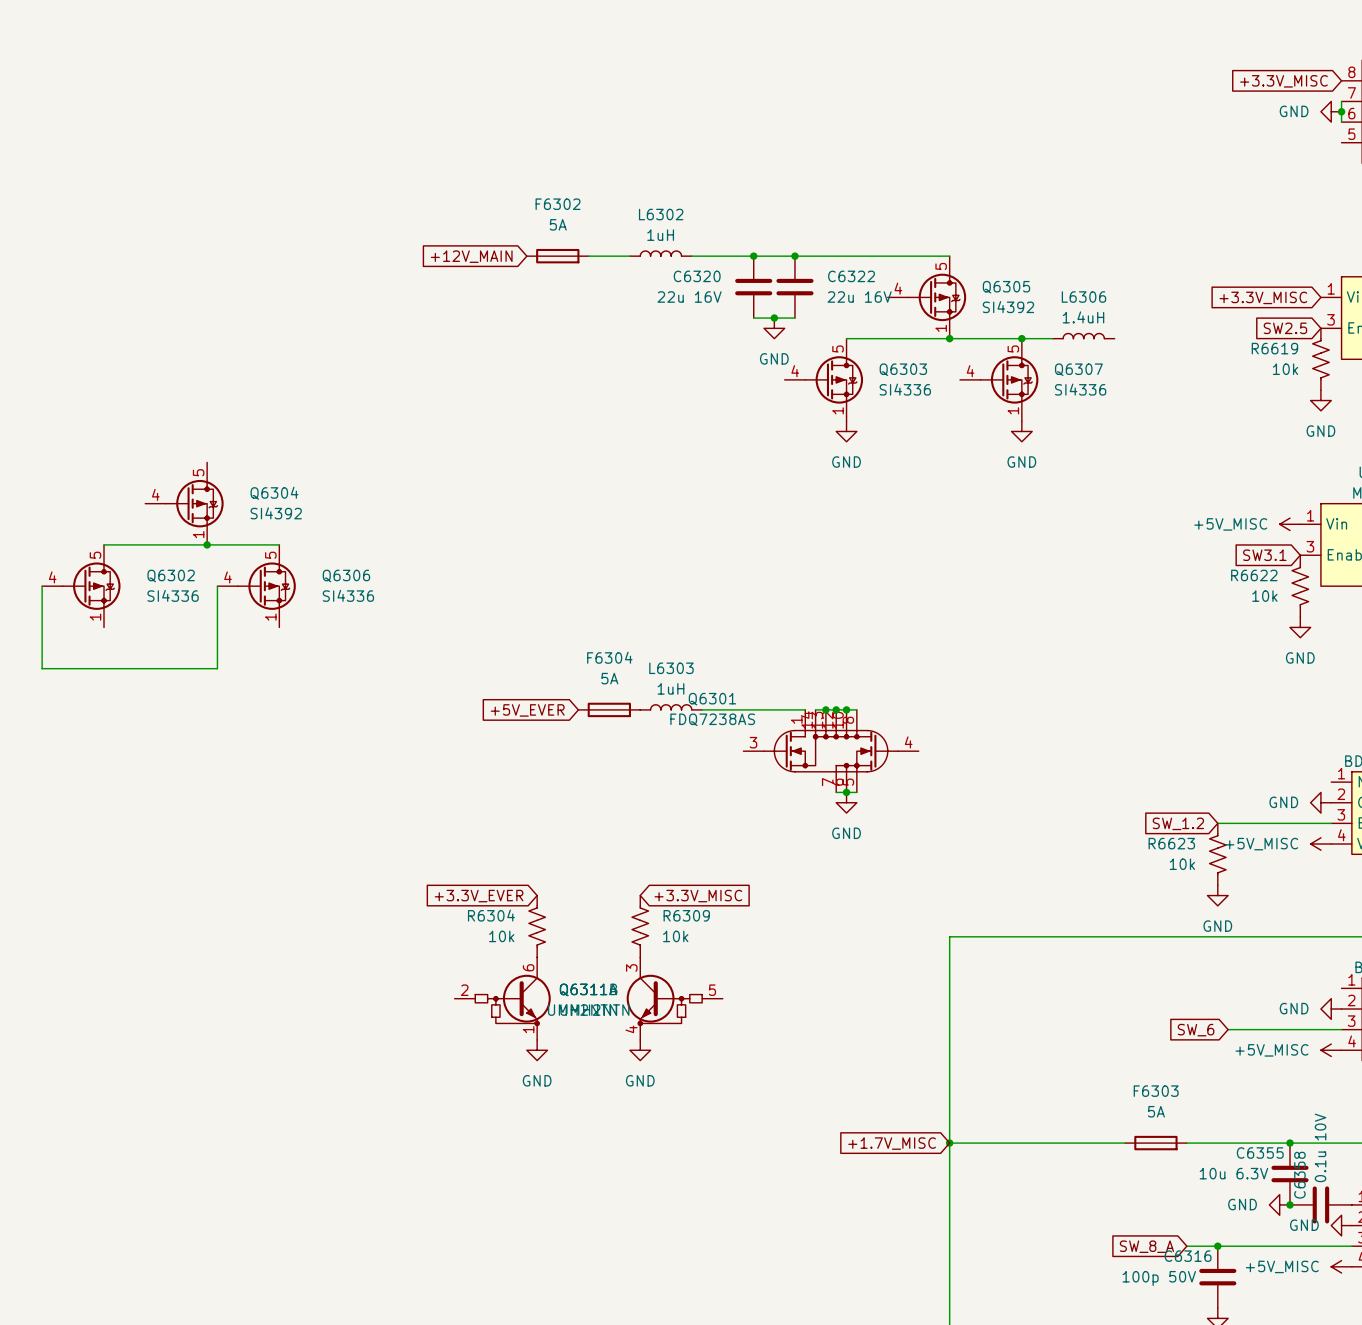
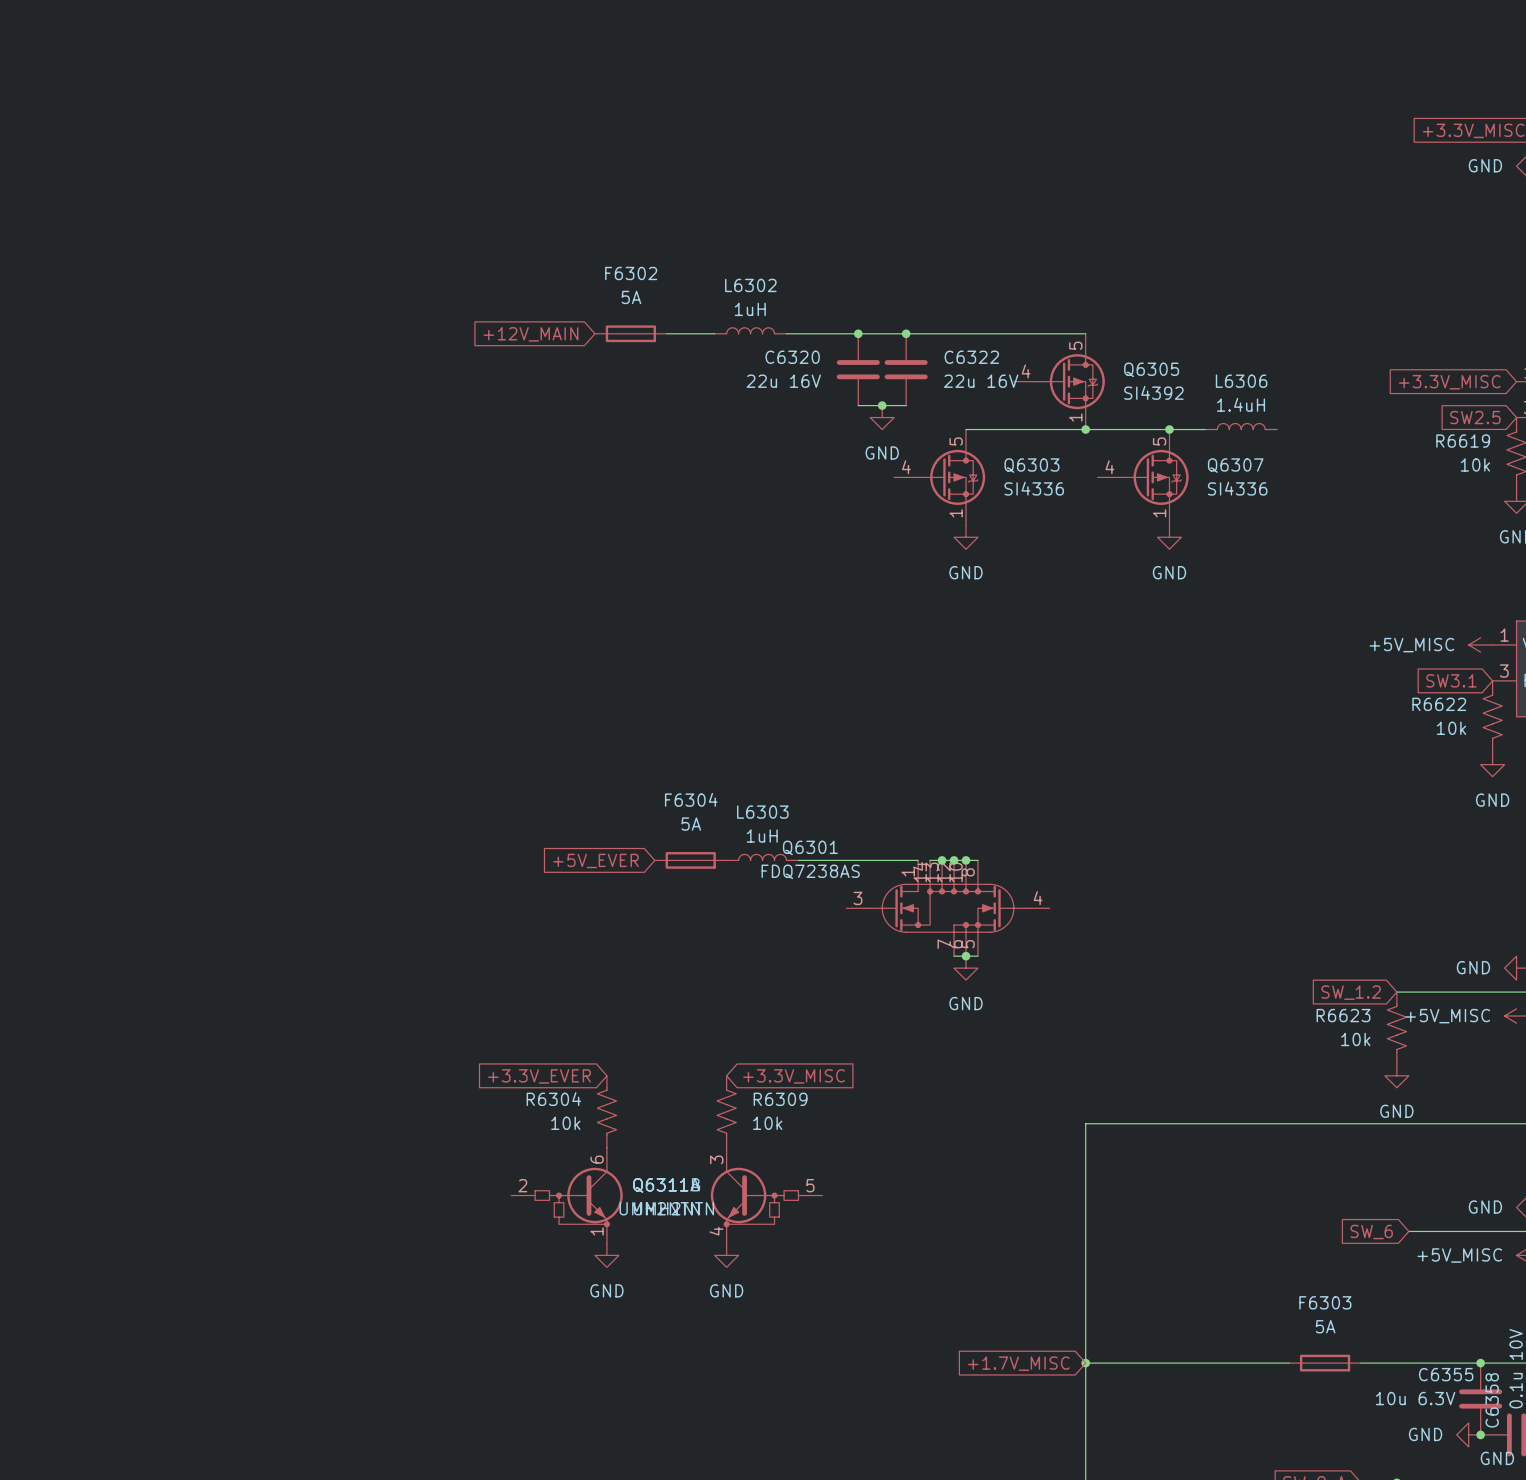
Q6304: SI4392 (184, 503) -> none
wire: (104, 544) (279, 544) -> none
junction: (207, 544) -> none
wire: (42, 586) (42, 668) (217, 668) (217, 586) -> none
Q6302: SI4336 (81, 586) -> none
Q6306: SI4336 (256, 586) -> none

